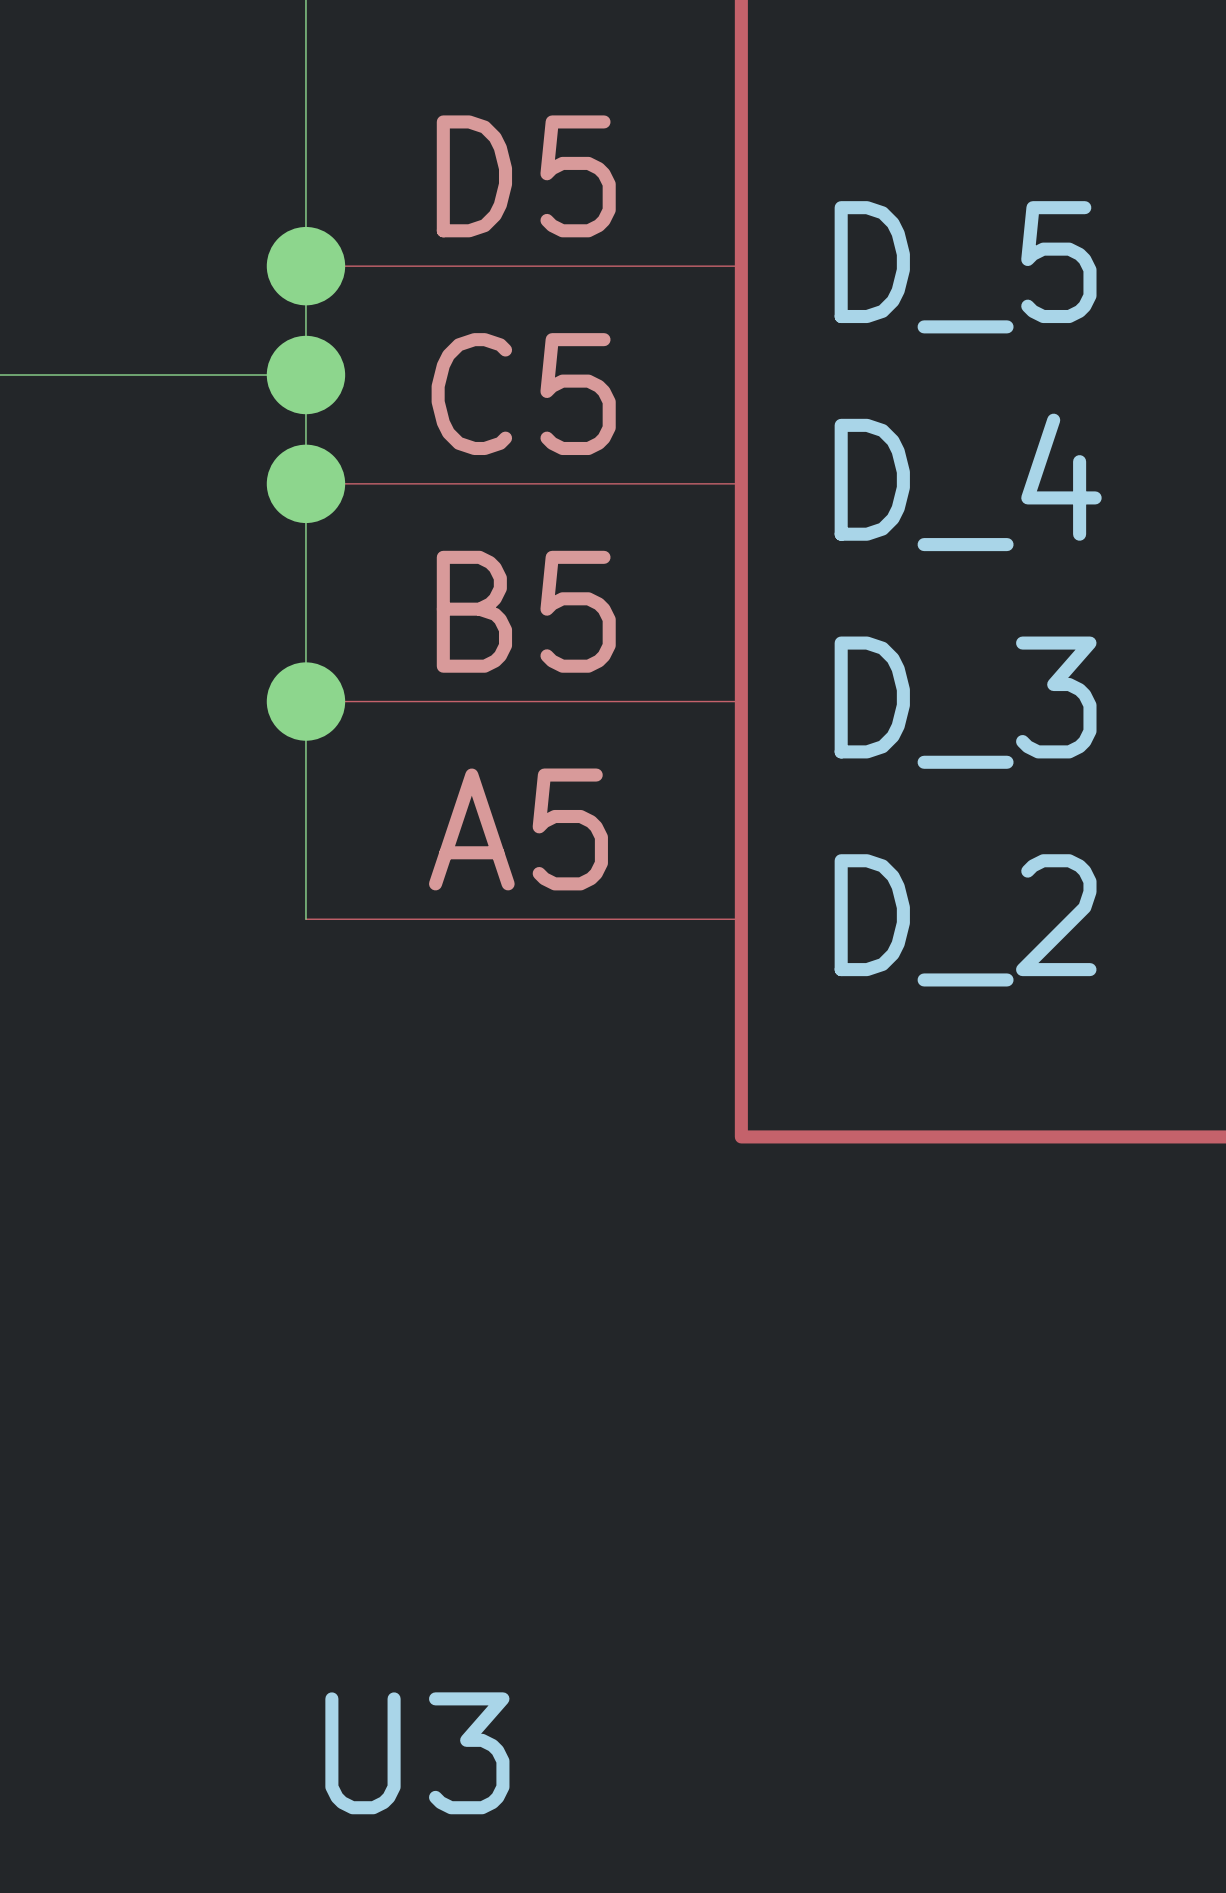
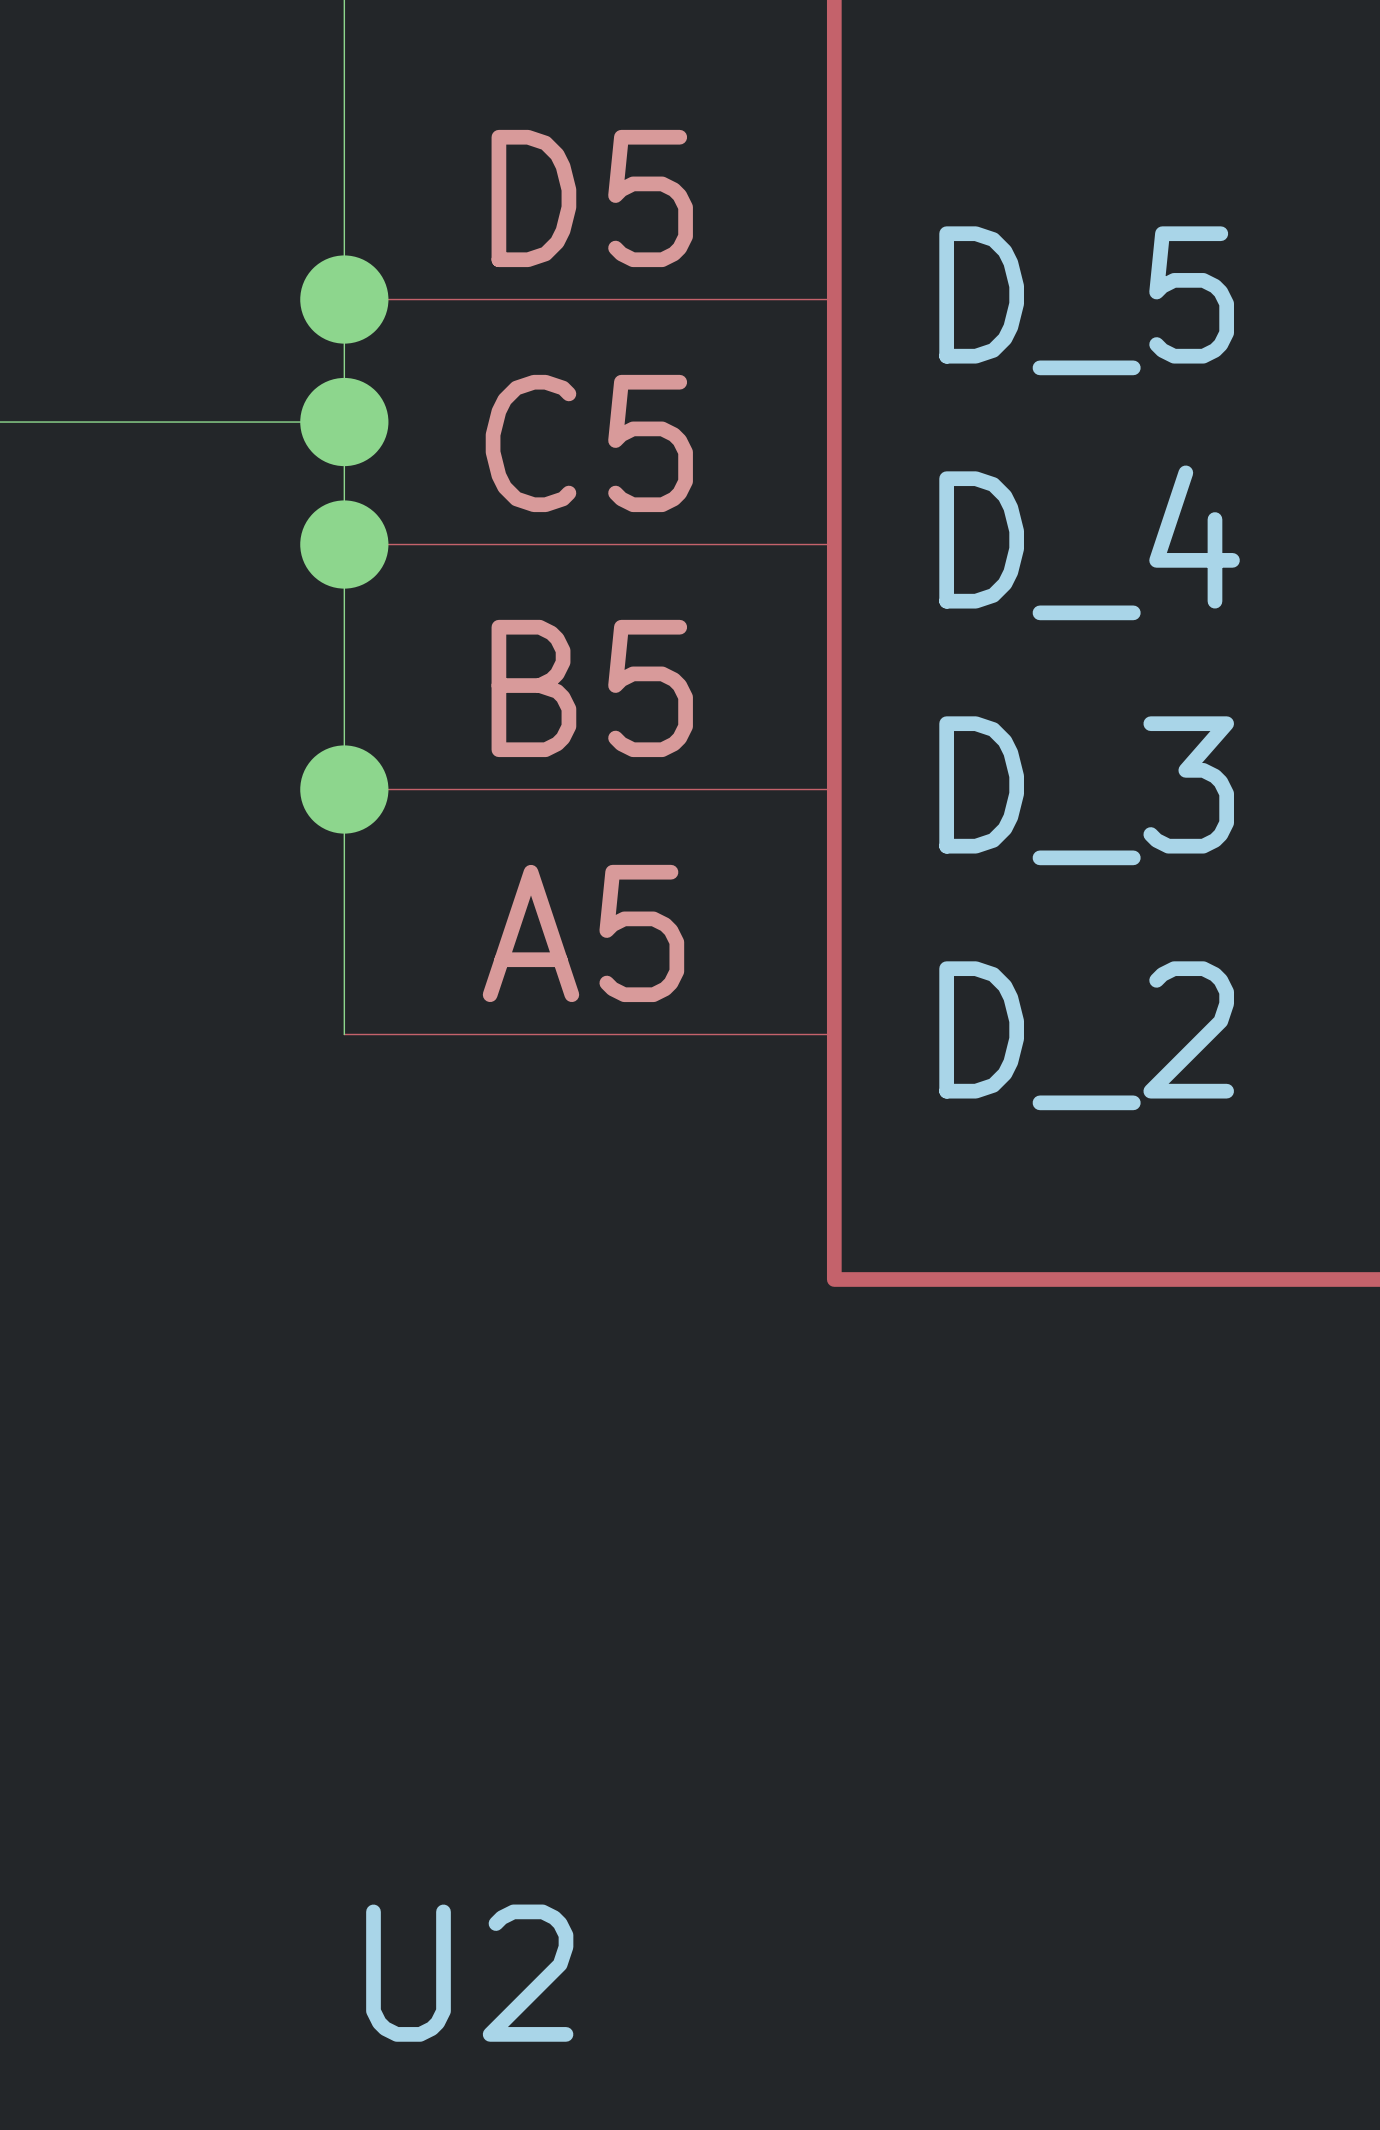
U3 name: U3 (417, 1753) -> U2 (469, 1973)

